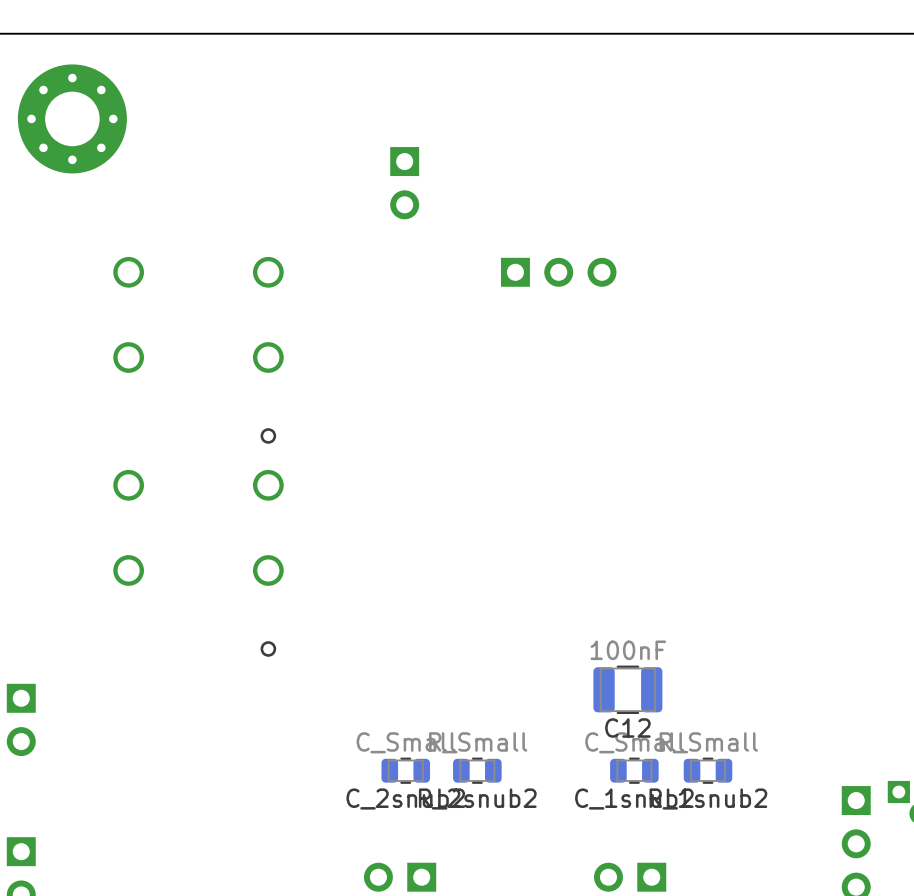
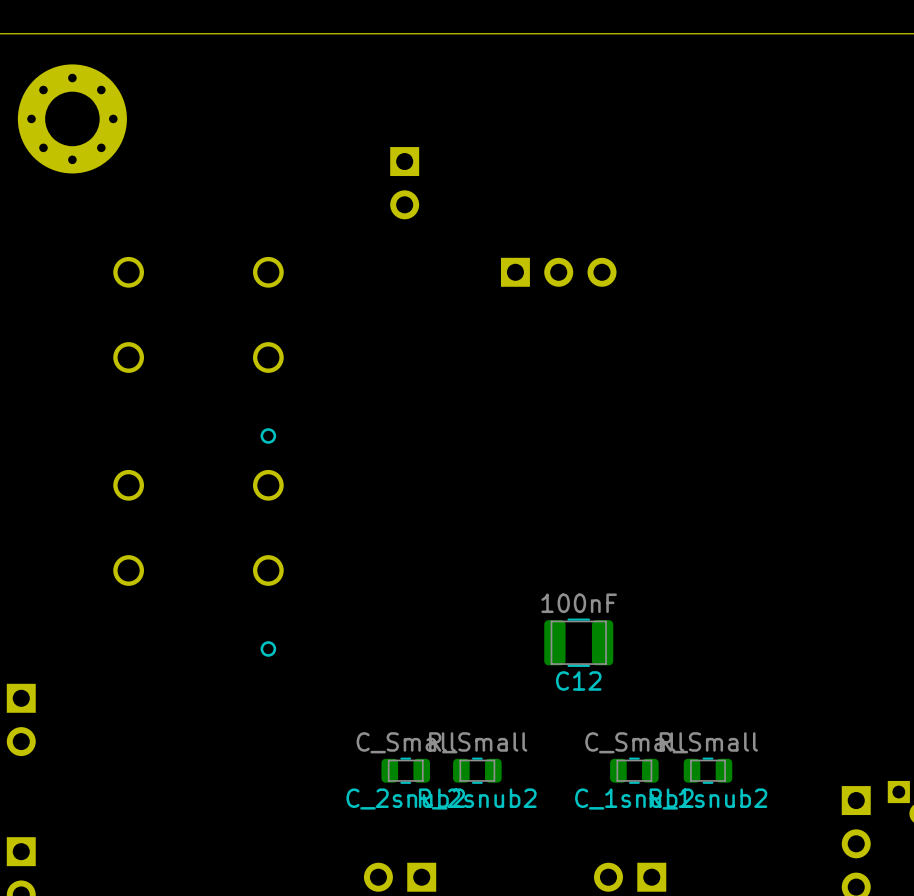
C12 position: (627, 689) -> (578, 642)

